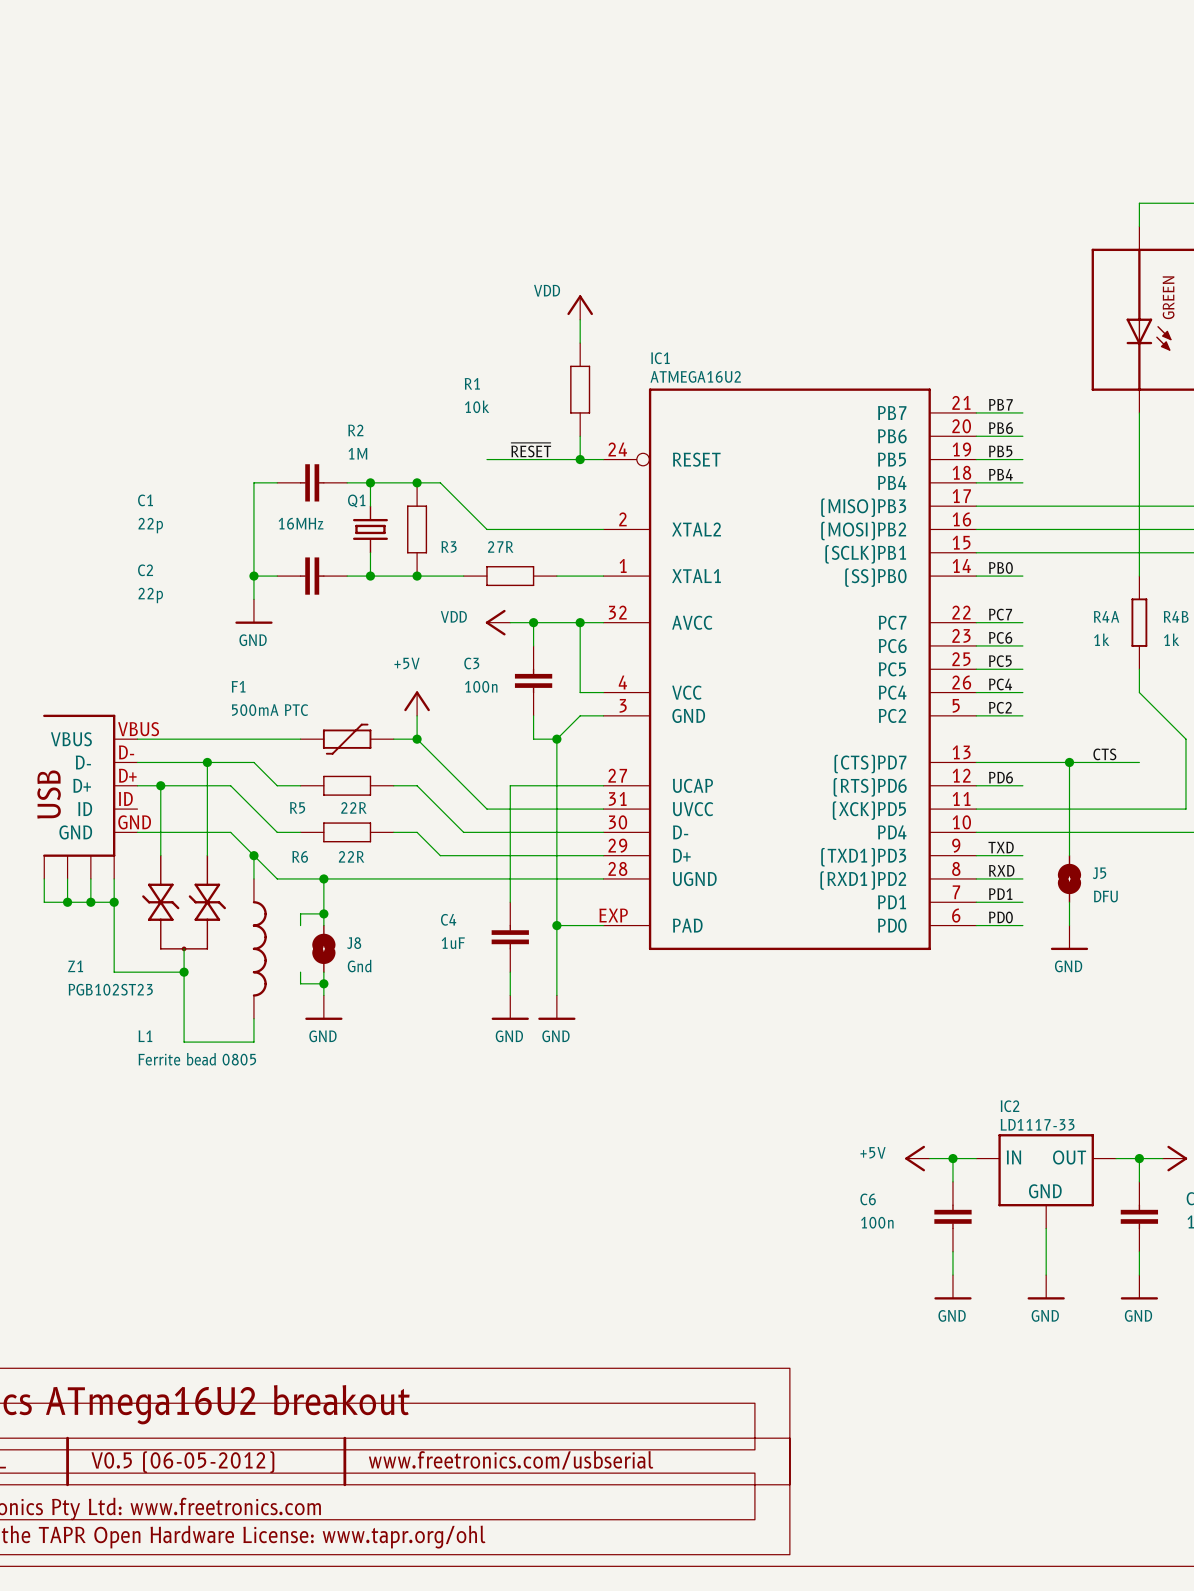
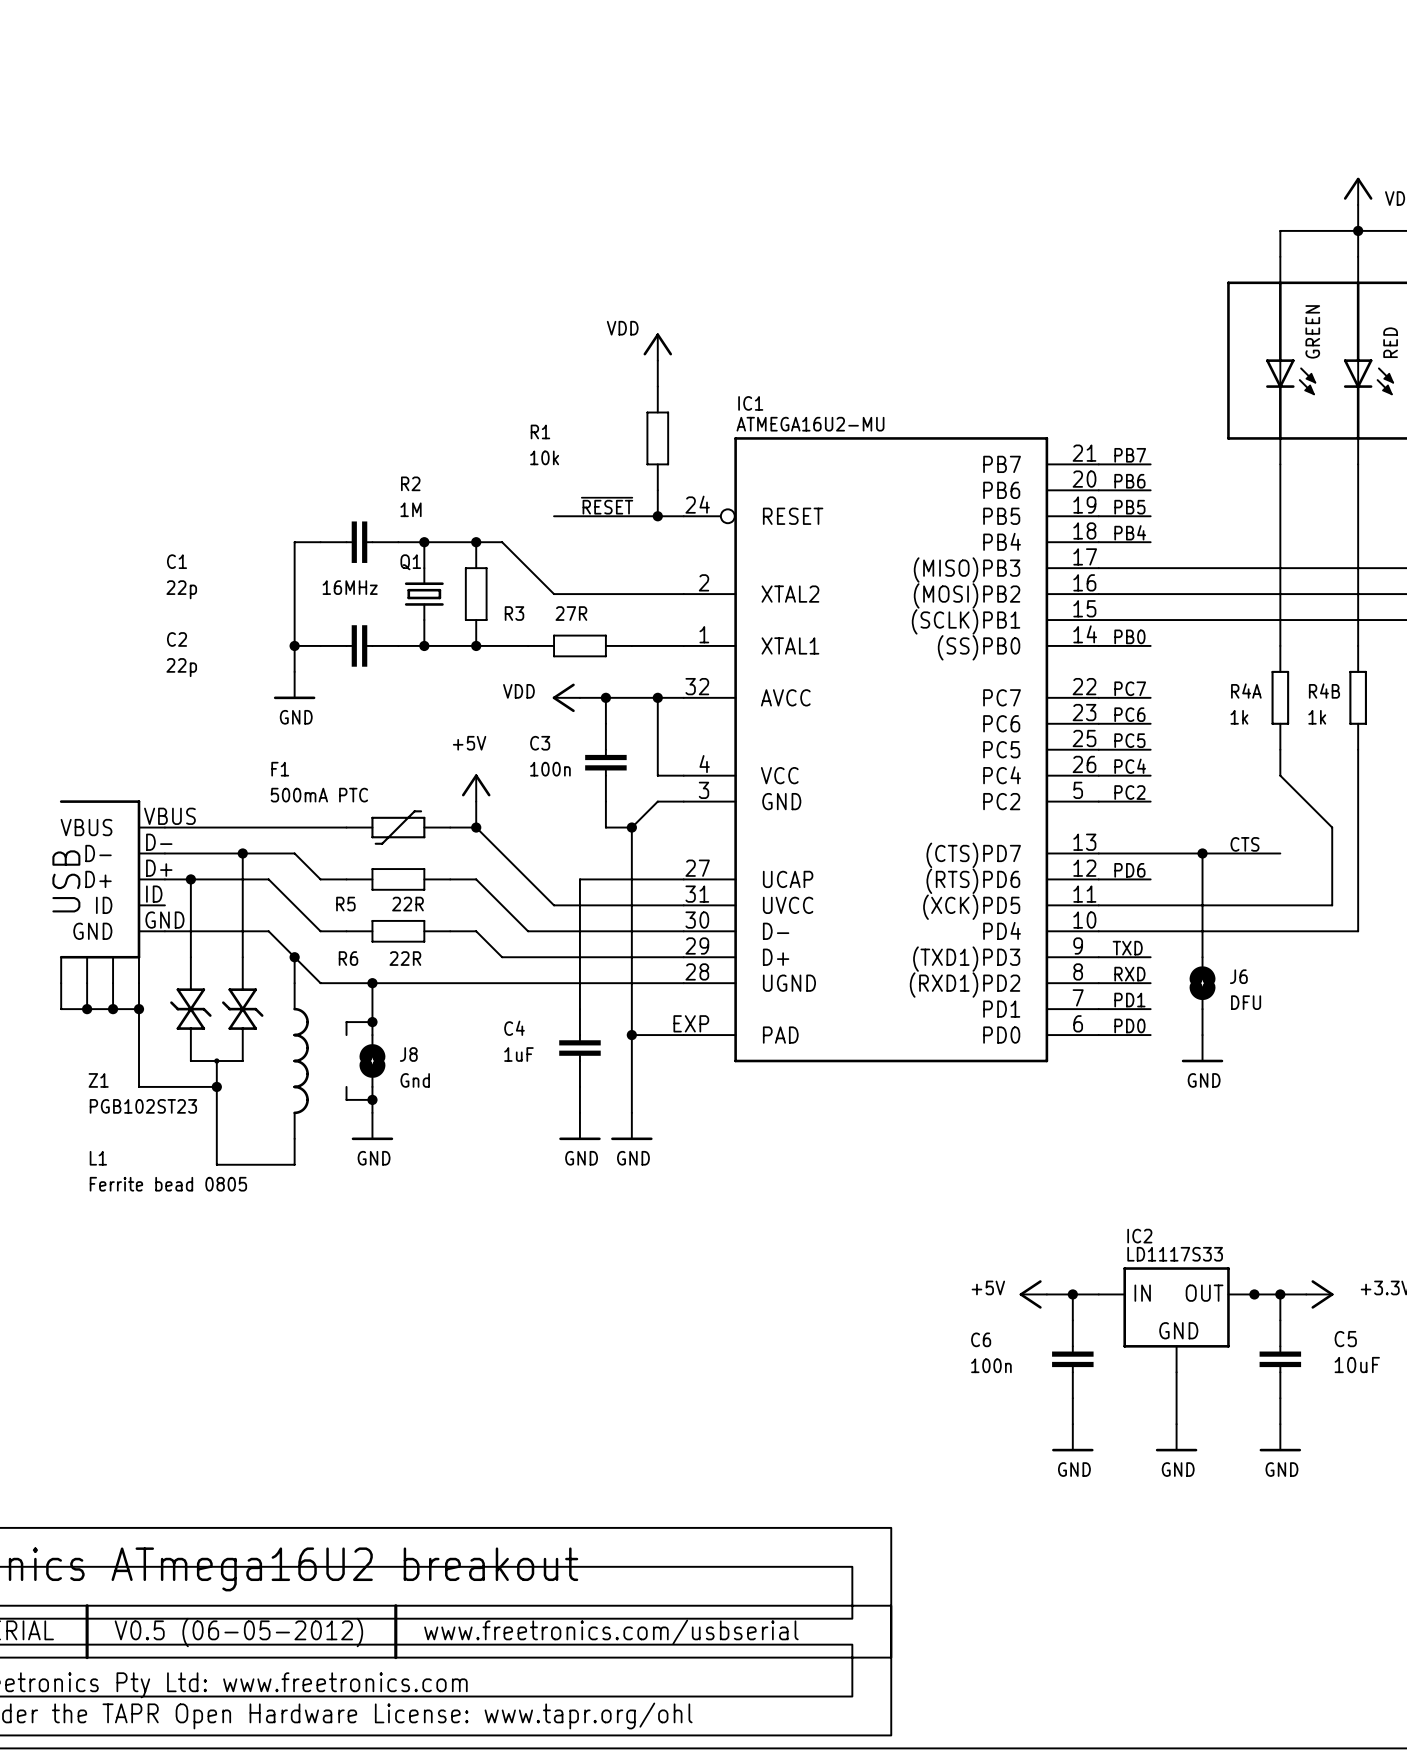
IC1 value: ATMEGA16U2 (695, 376) -> ATMEGA16U2-MU (810, 424)
J5 name: J5 (1099, 873) -> J6 (1238, 976)
L1 name position: L1 (145, 1036) -> L1 (98, 1158)
L1 value position: Ferrite bead 0805 (197, 1059) -> Ferrite bead 0805 (168, 1184)
IC2 value: LD1117-33 (1037, 1124) -> LD1117S33 (1175, 1254)
junction: none -> (1254, 1294)

